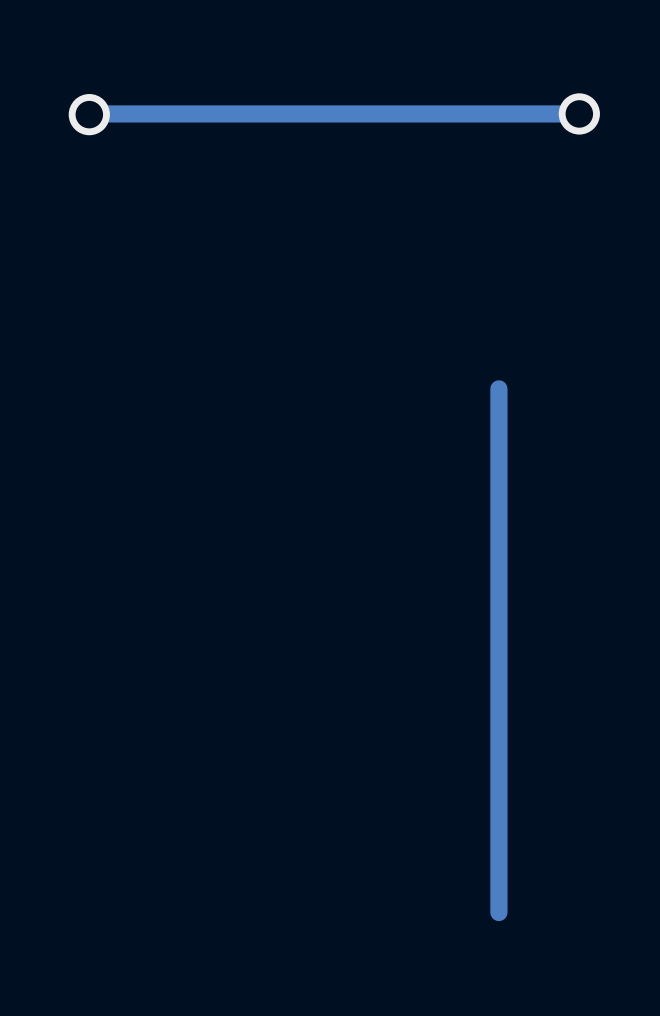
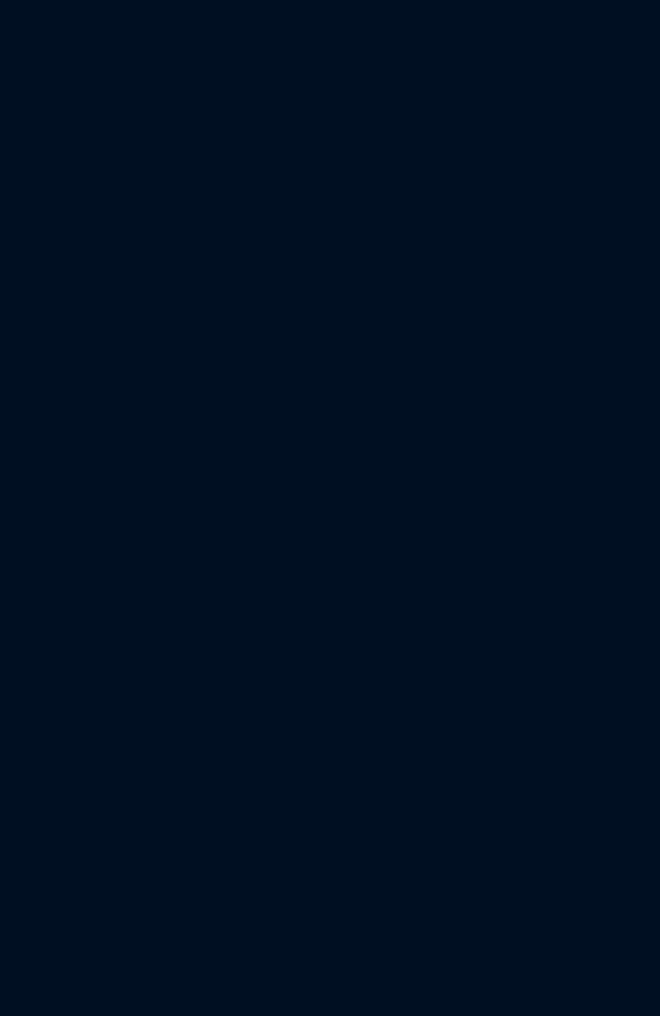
track: (579, 113) (90, 113) -> none
via: (579, 113) -> none
via: (89, 114) -> none
track: (498, 388) (498, 912) -> none

